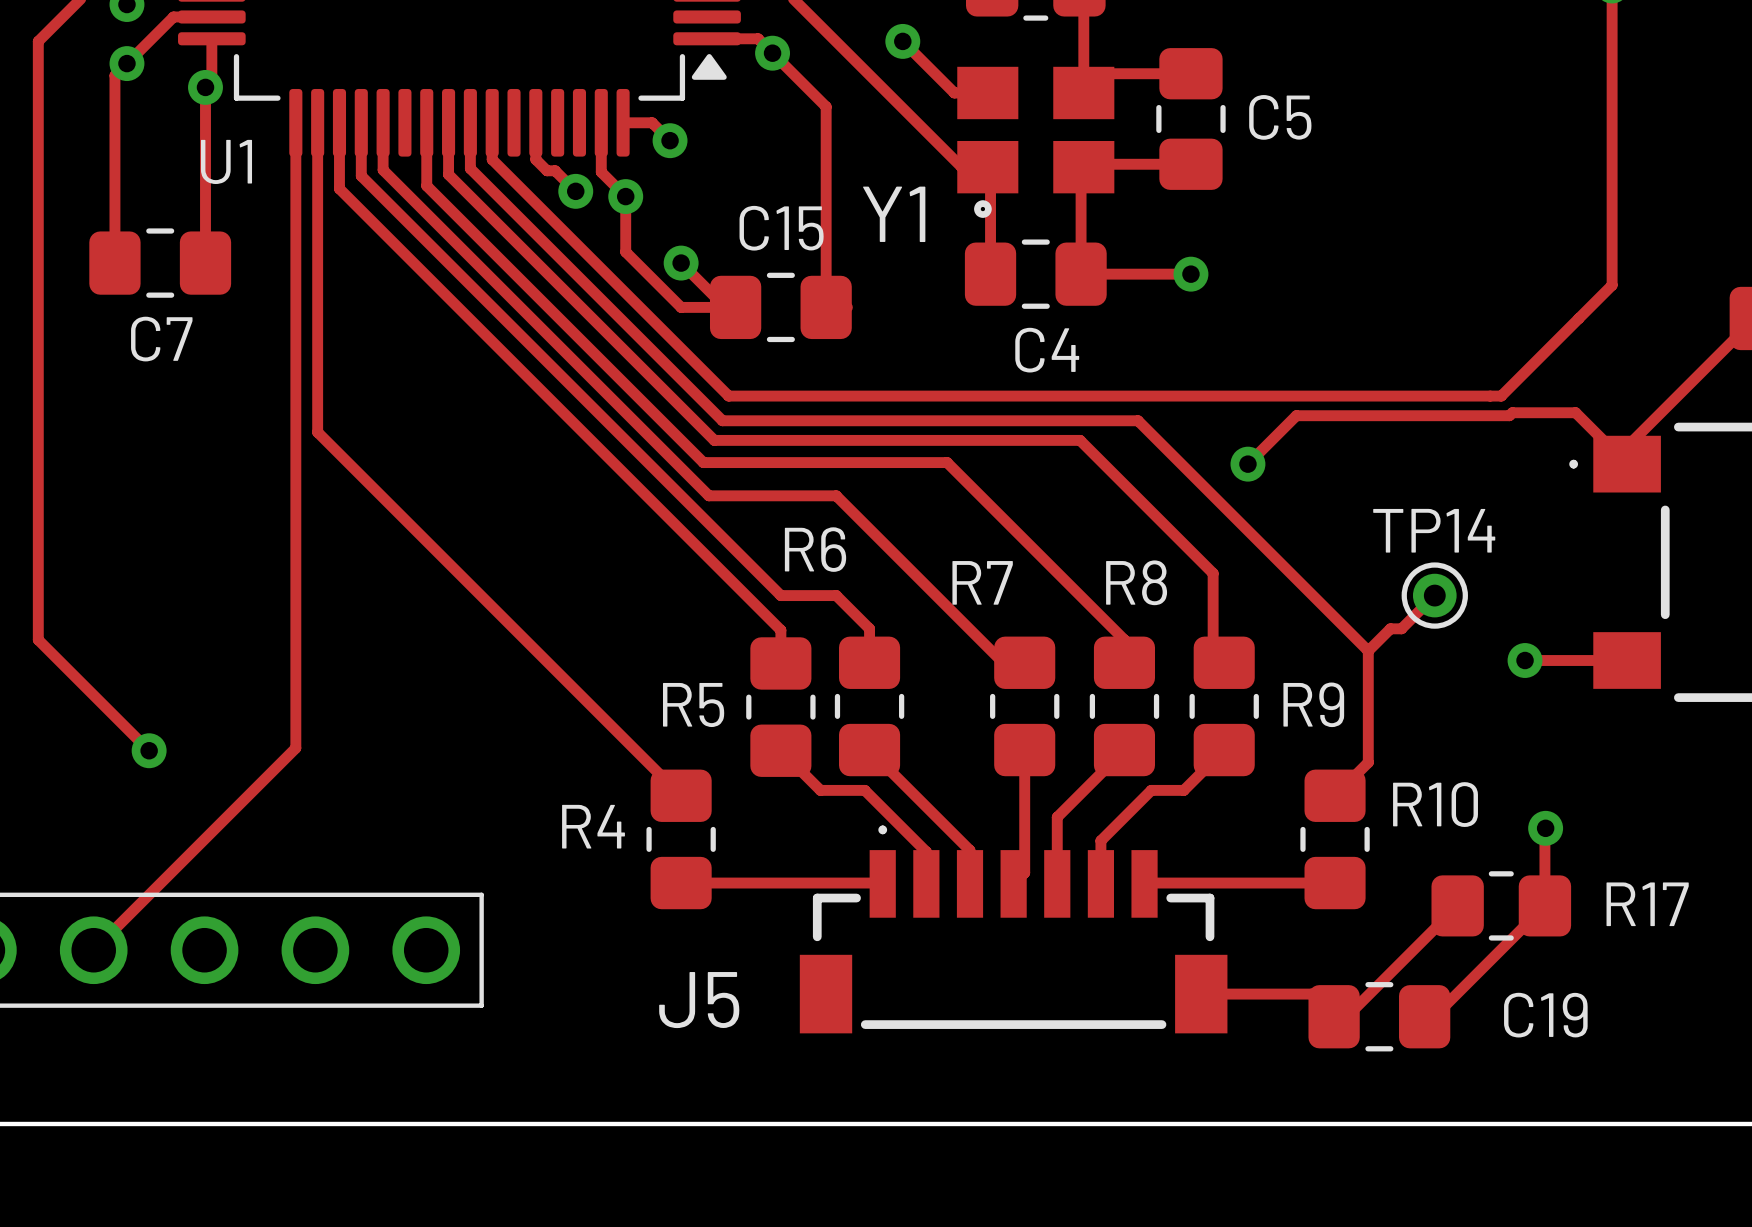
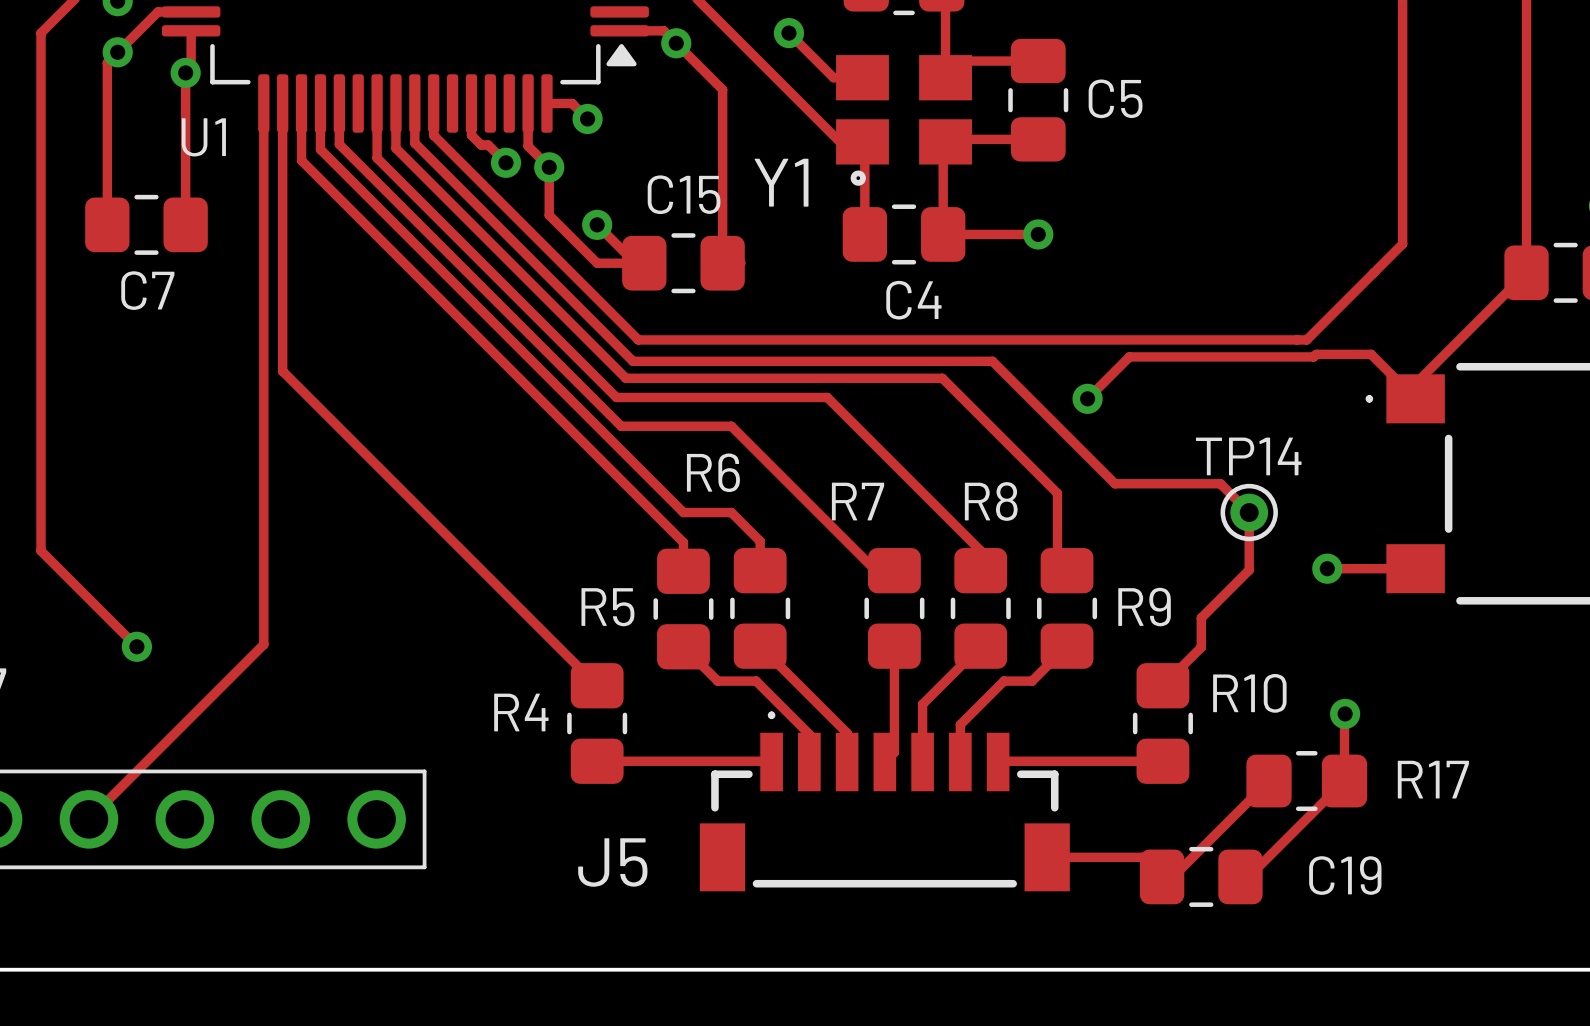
track: (1279, 562) (1368, 650) -> (1114, 483) (1220, 483) (1249, 512) (1249, 570) (1201, 618) (1201, 647) (1191, 656)
track: (1434, 595) (1401, 628) (1390, 628) (1368, 650) -> none
track: (1368, 650) (1368, 762) -> none

